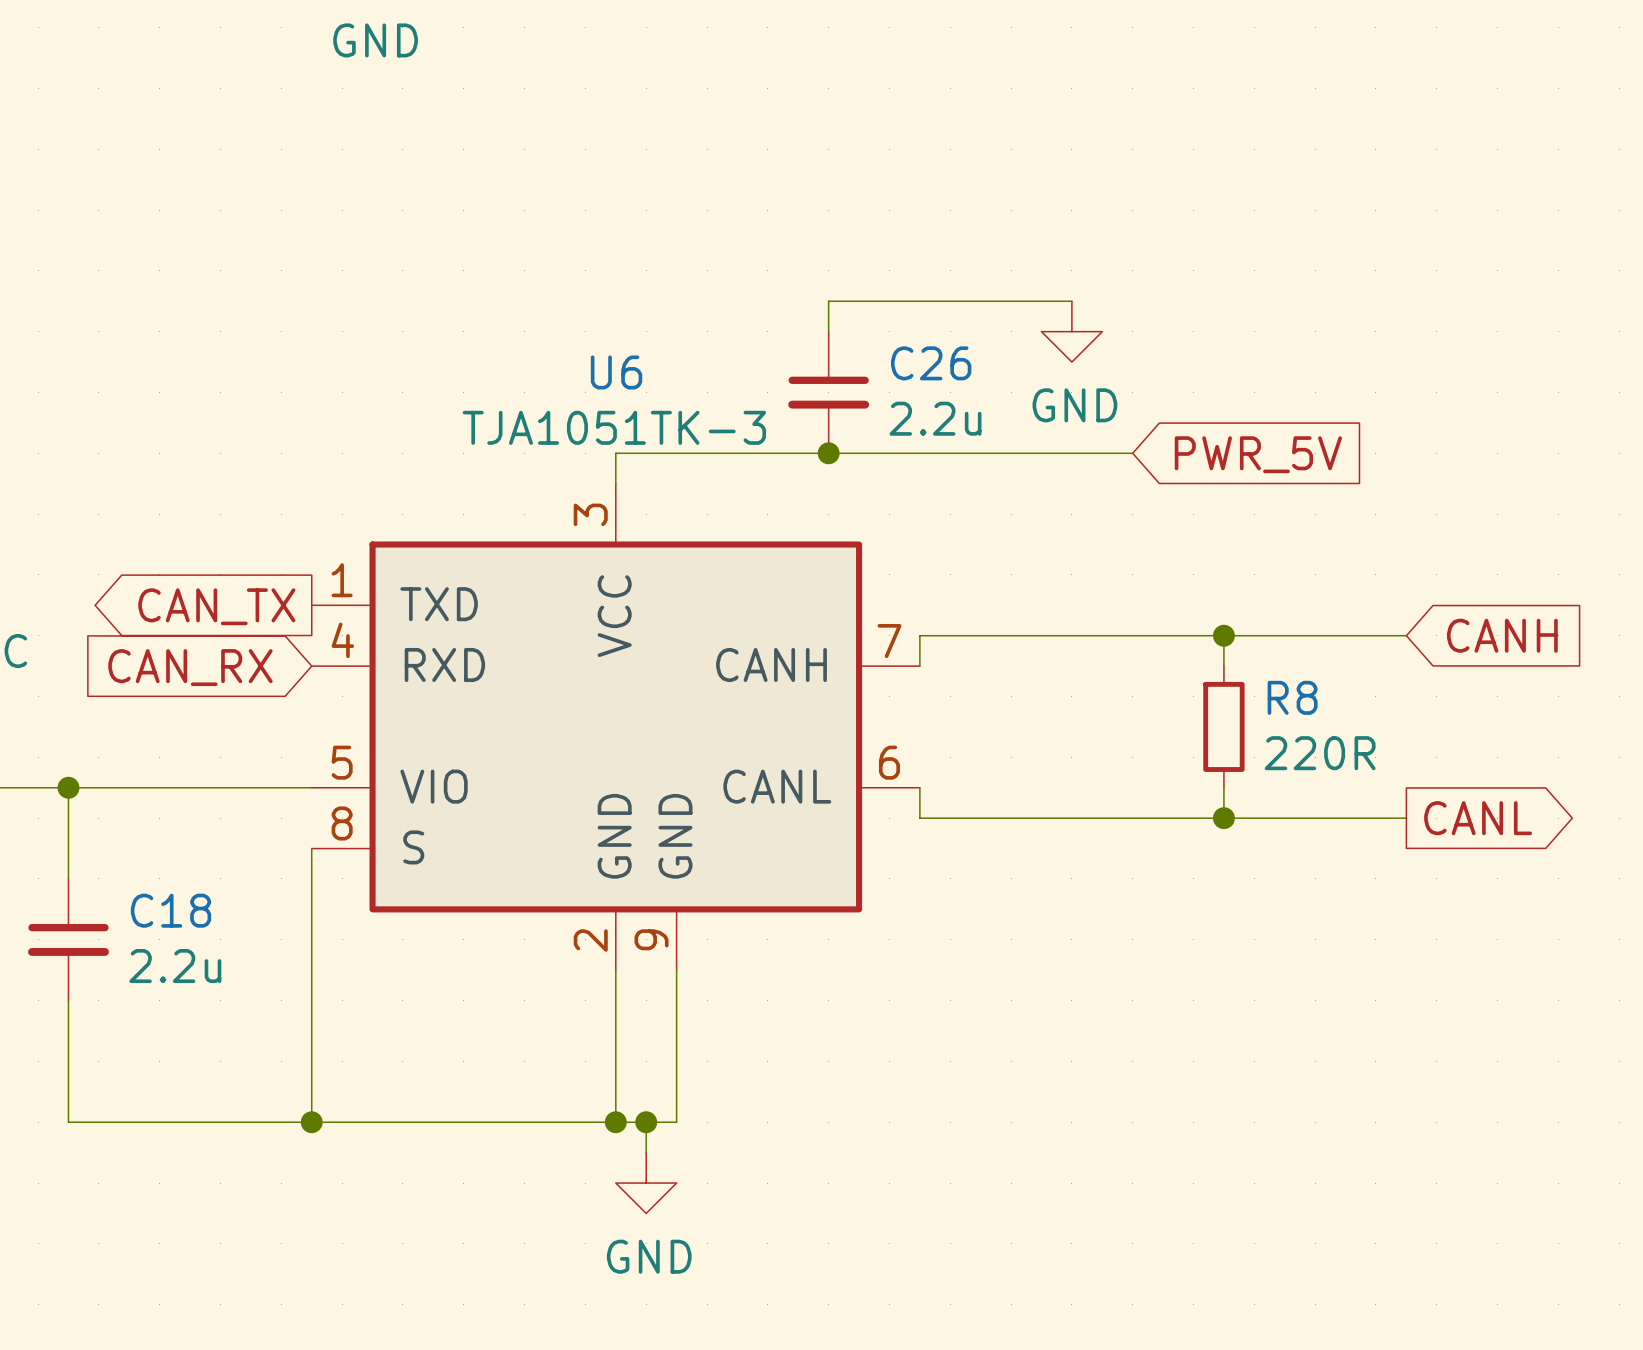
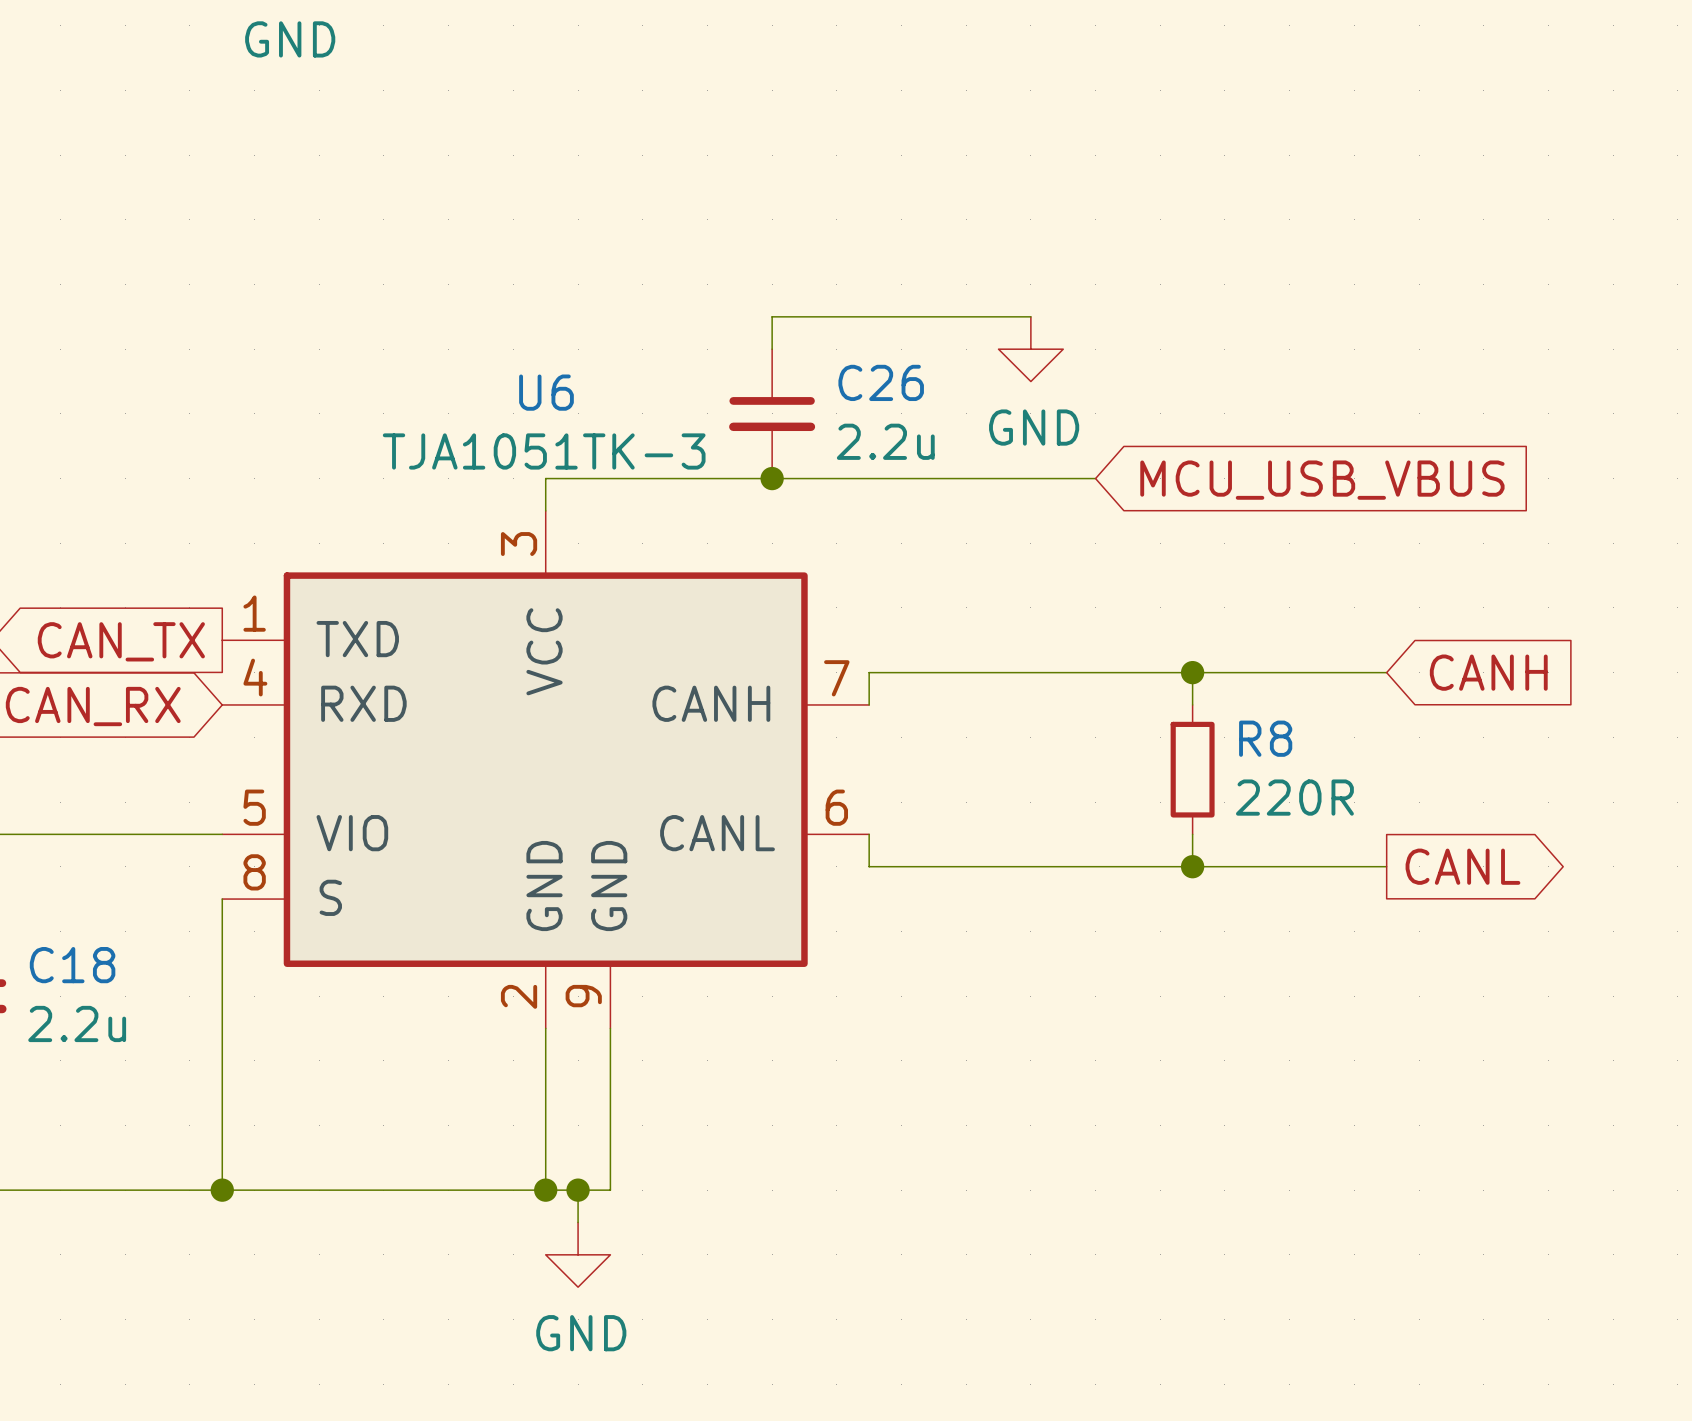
global label: PWR_5V (1258, 454) -> MCU_USB_VBUS (1322, 480)

